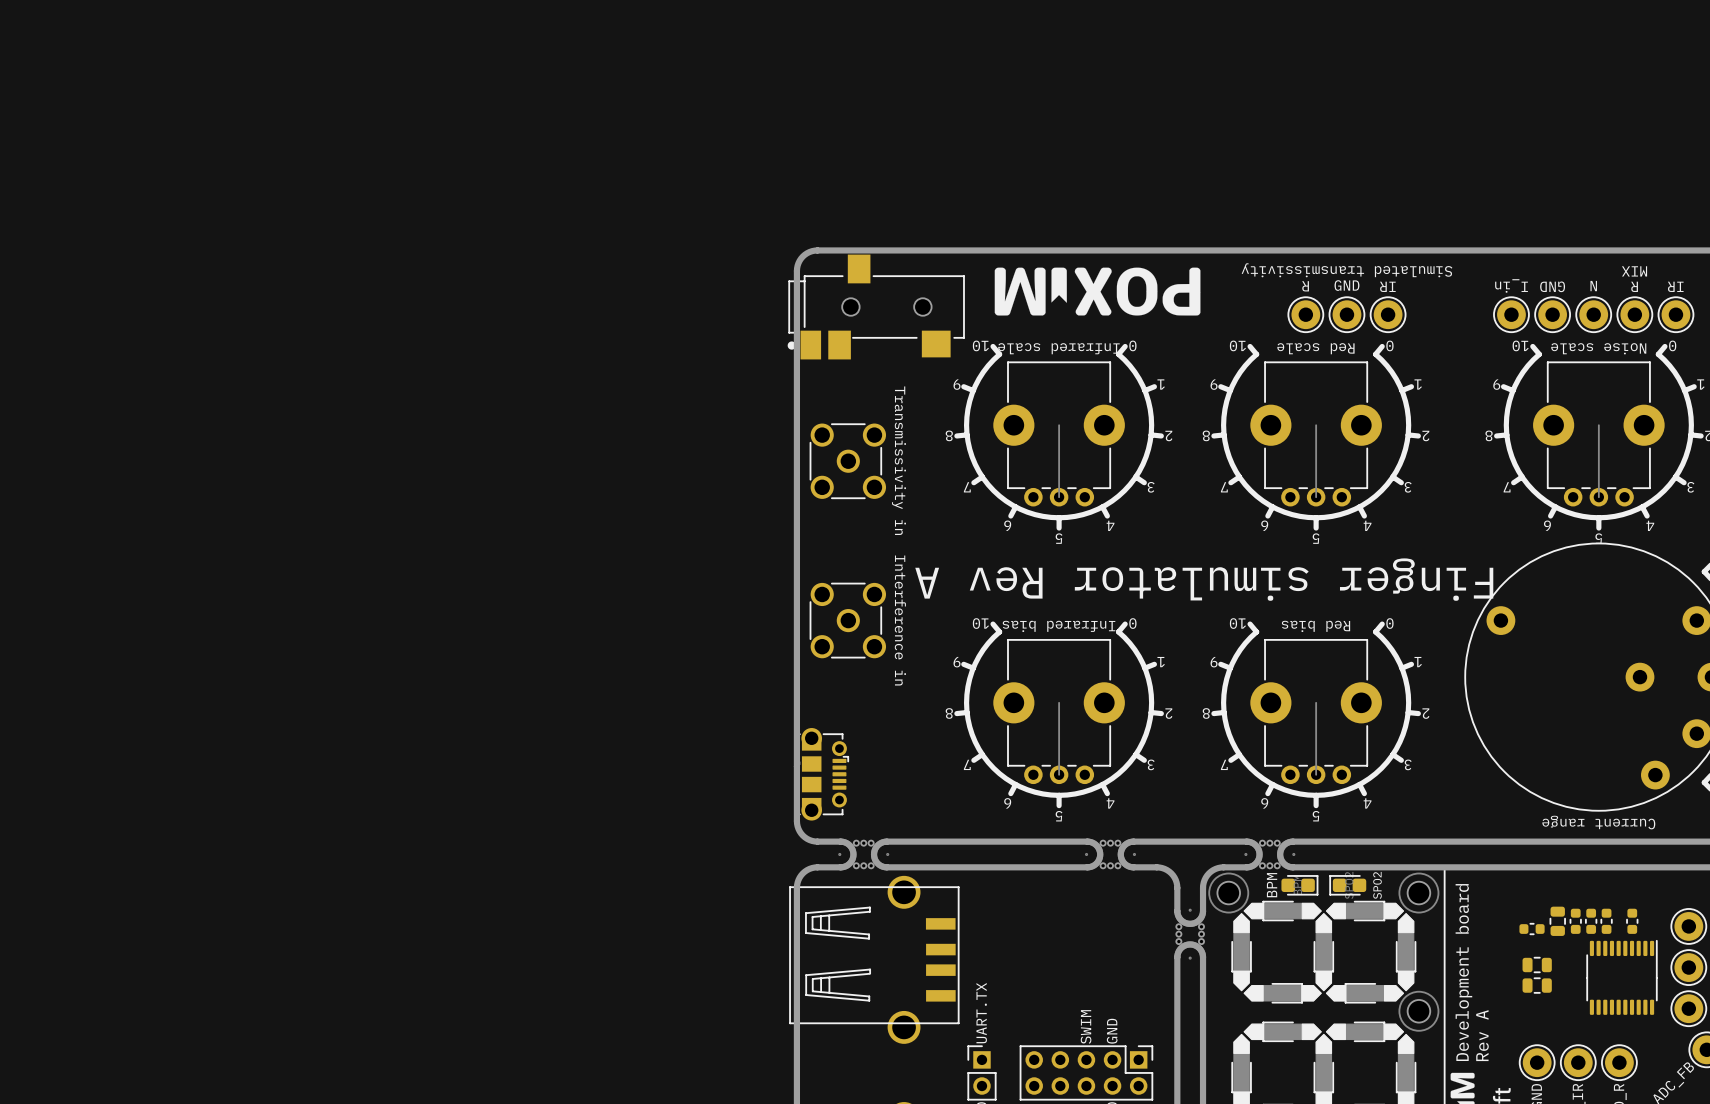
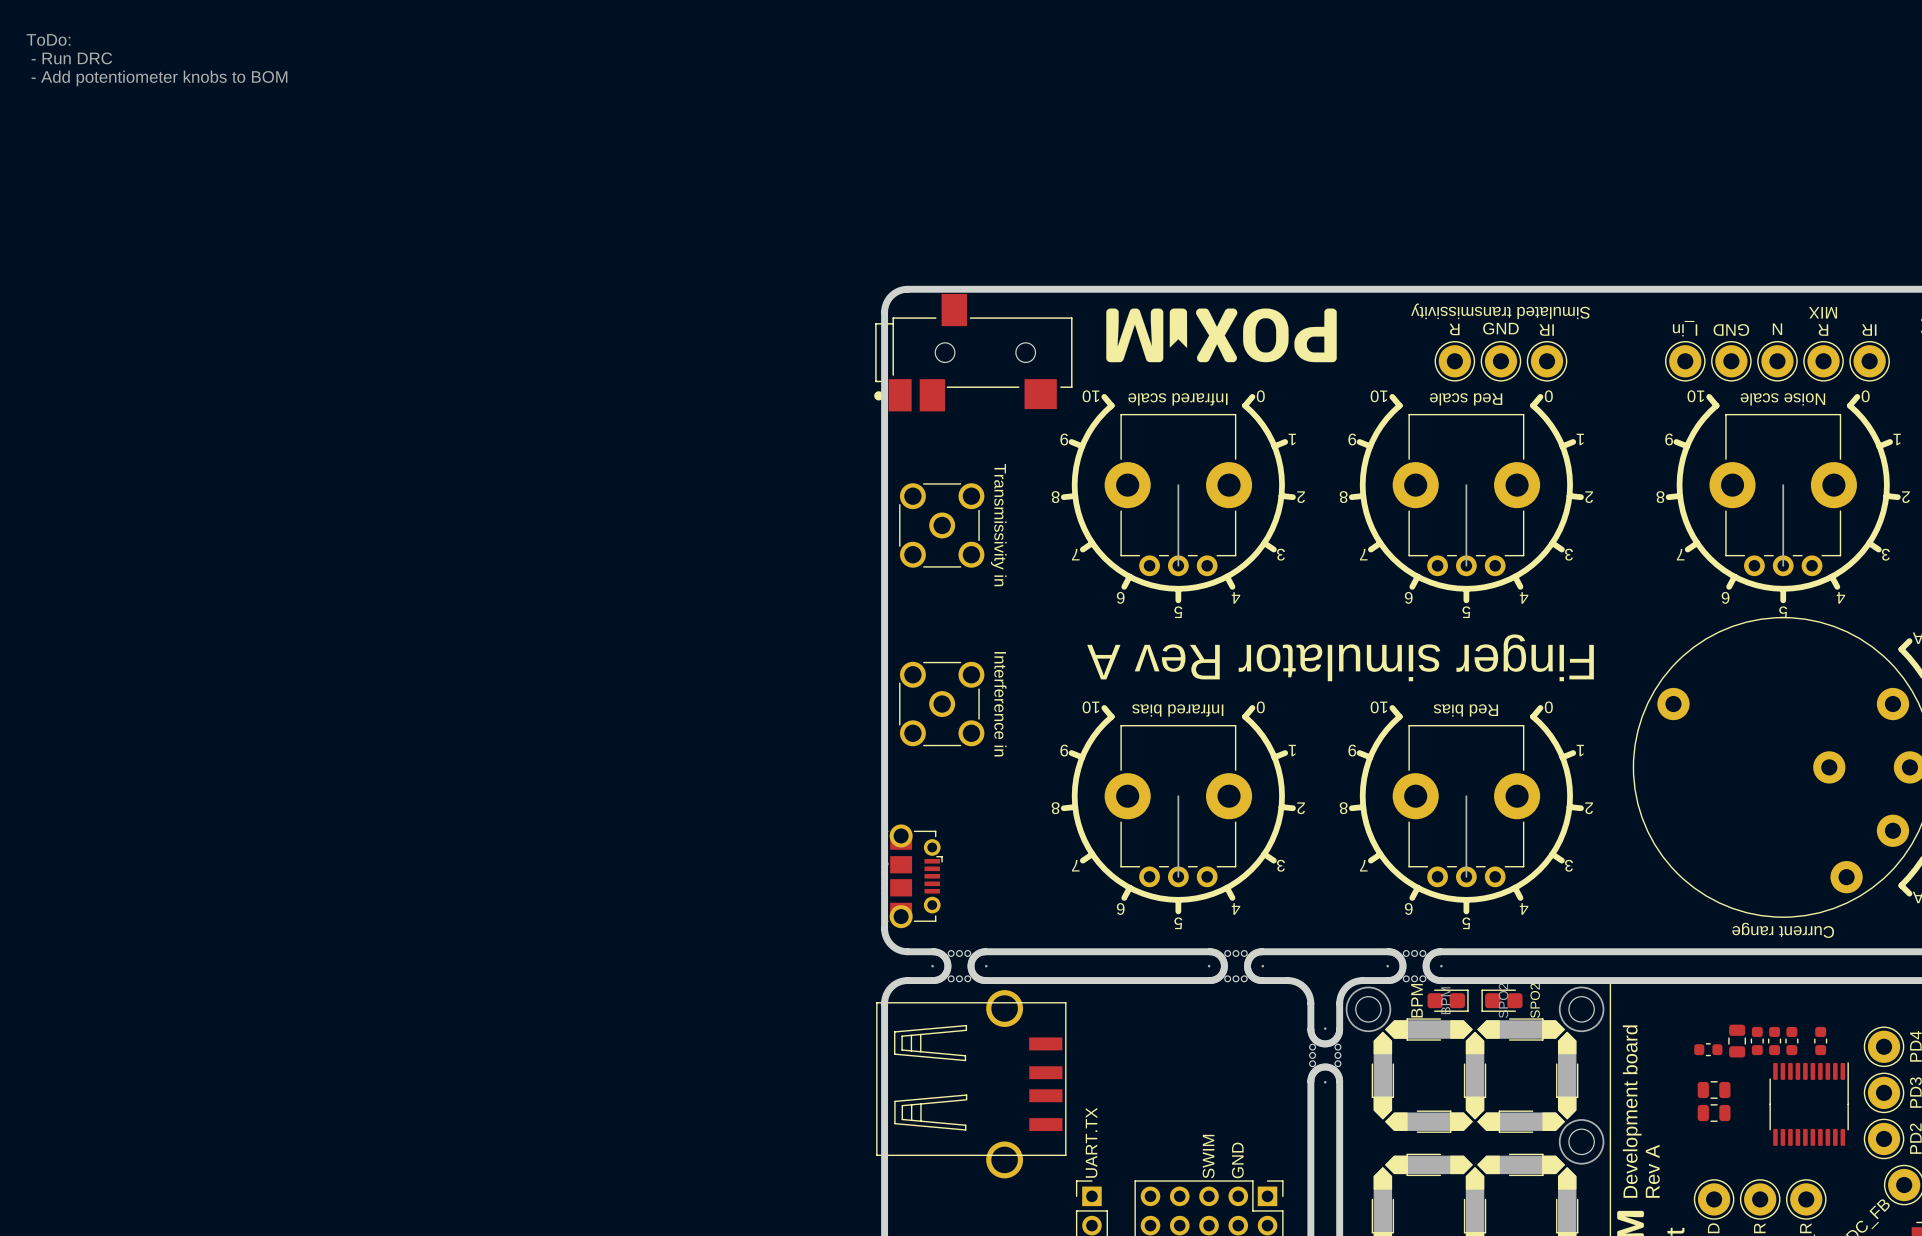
text: none -> ToDo: (48, 39)
text: none -> - Run DRC (71, 58)
text: none -> - Add potentiometer knobs to BOM (159, 78)

